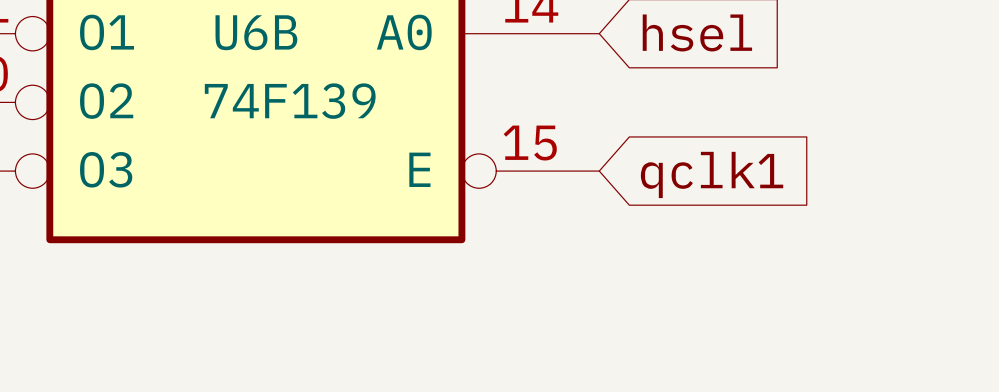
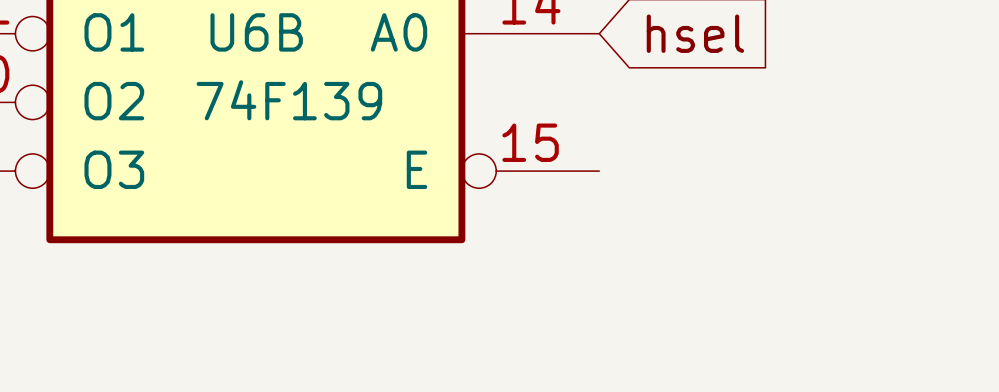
global label: qclk1 (712, 174) -> none

